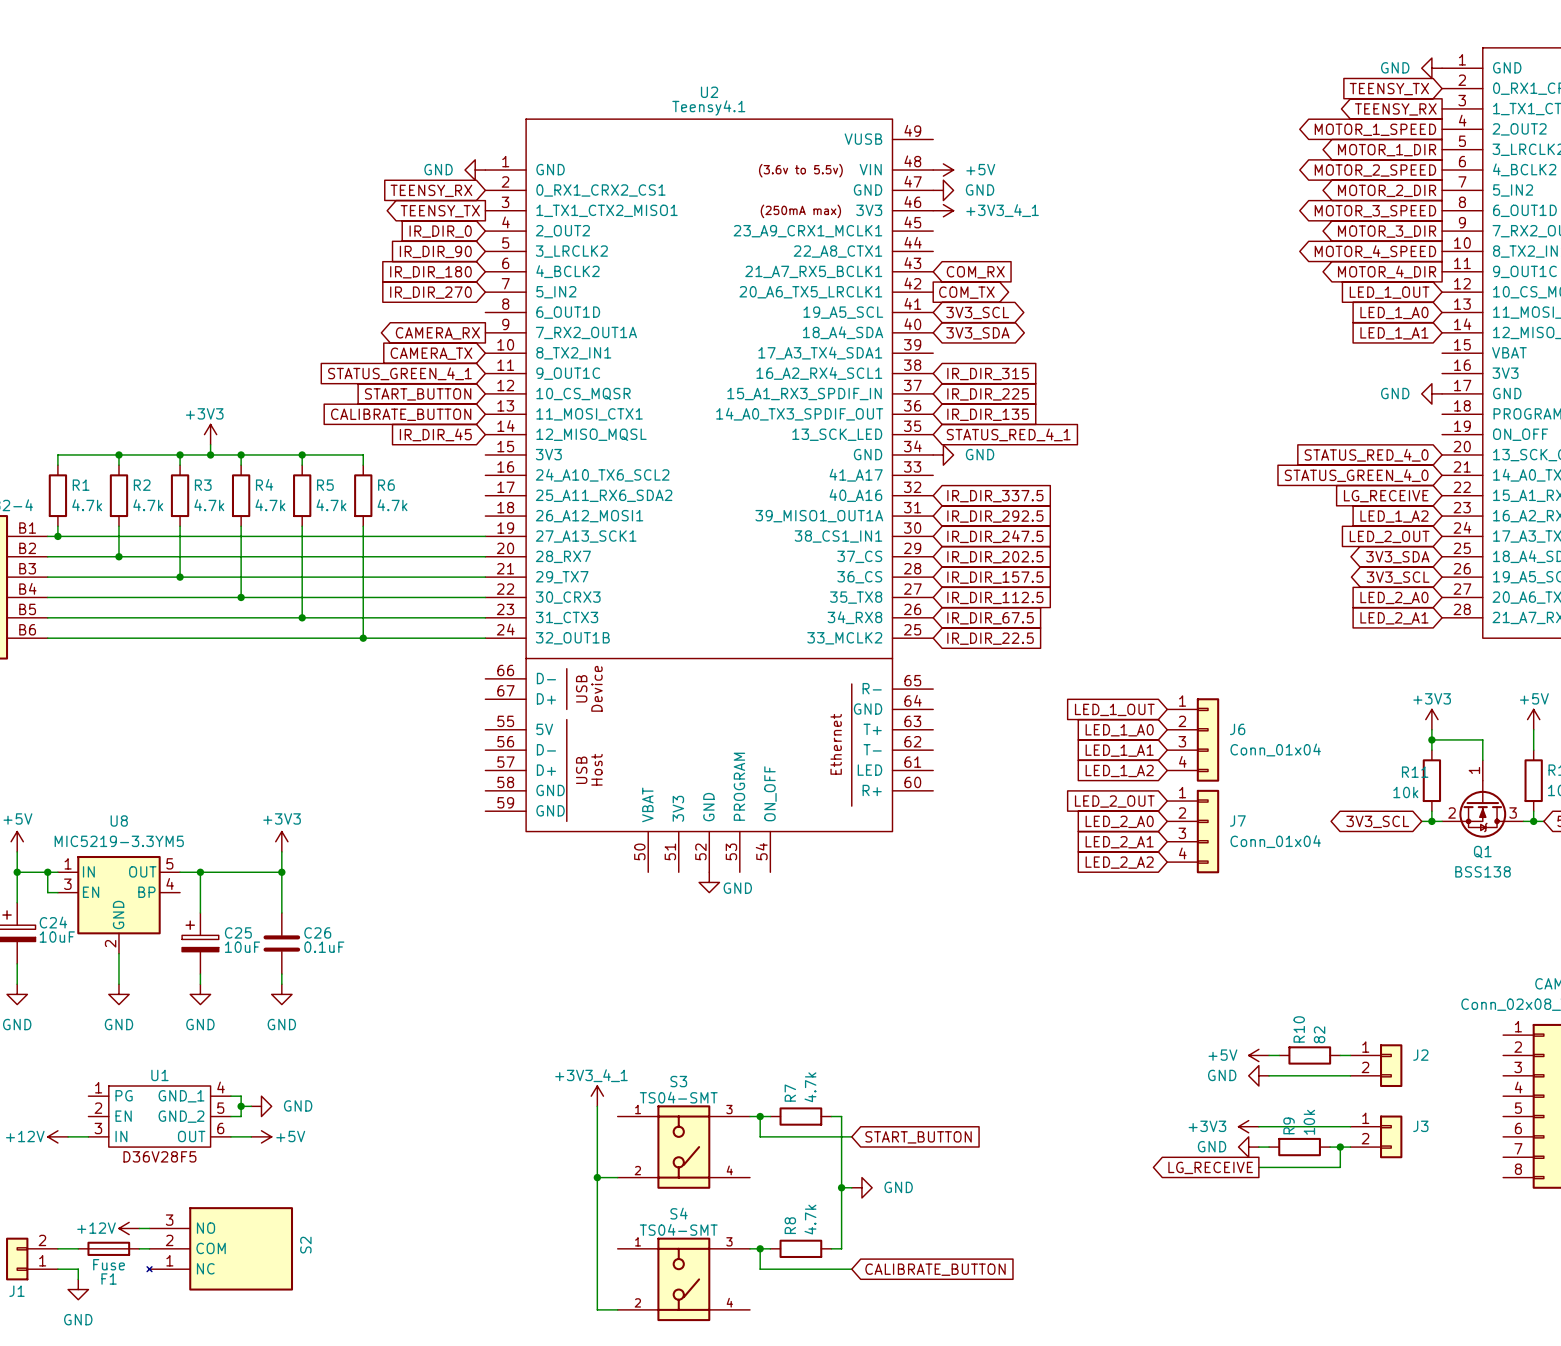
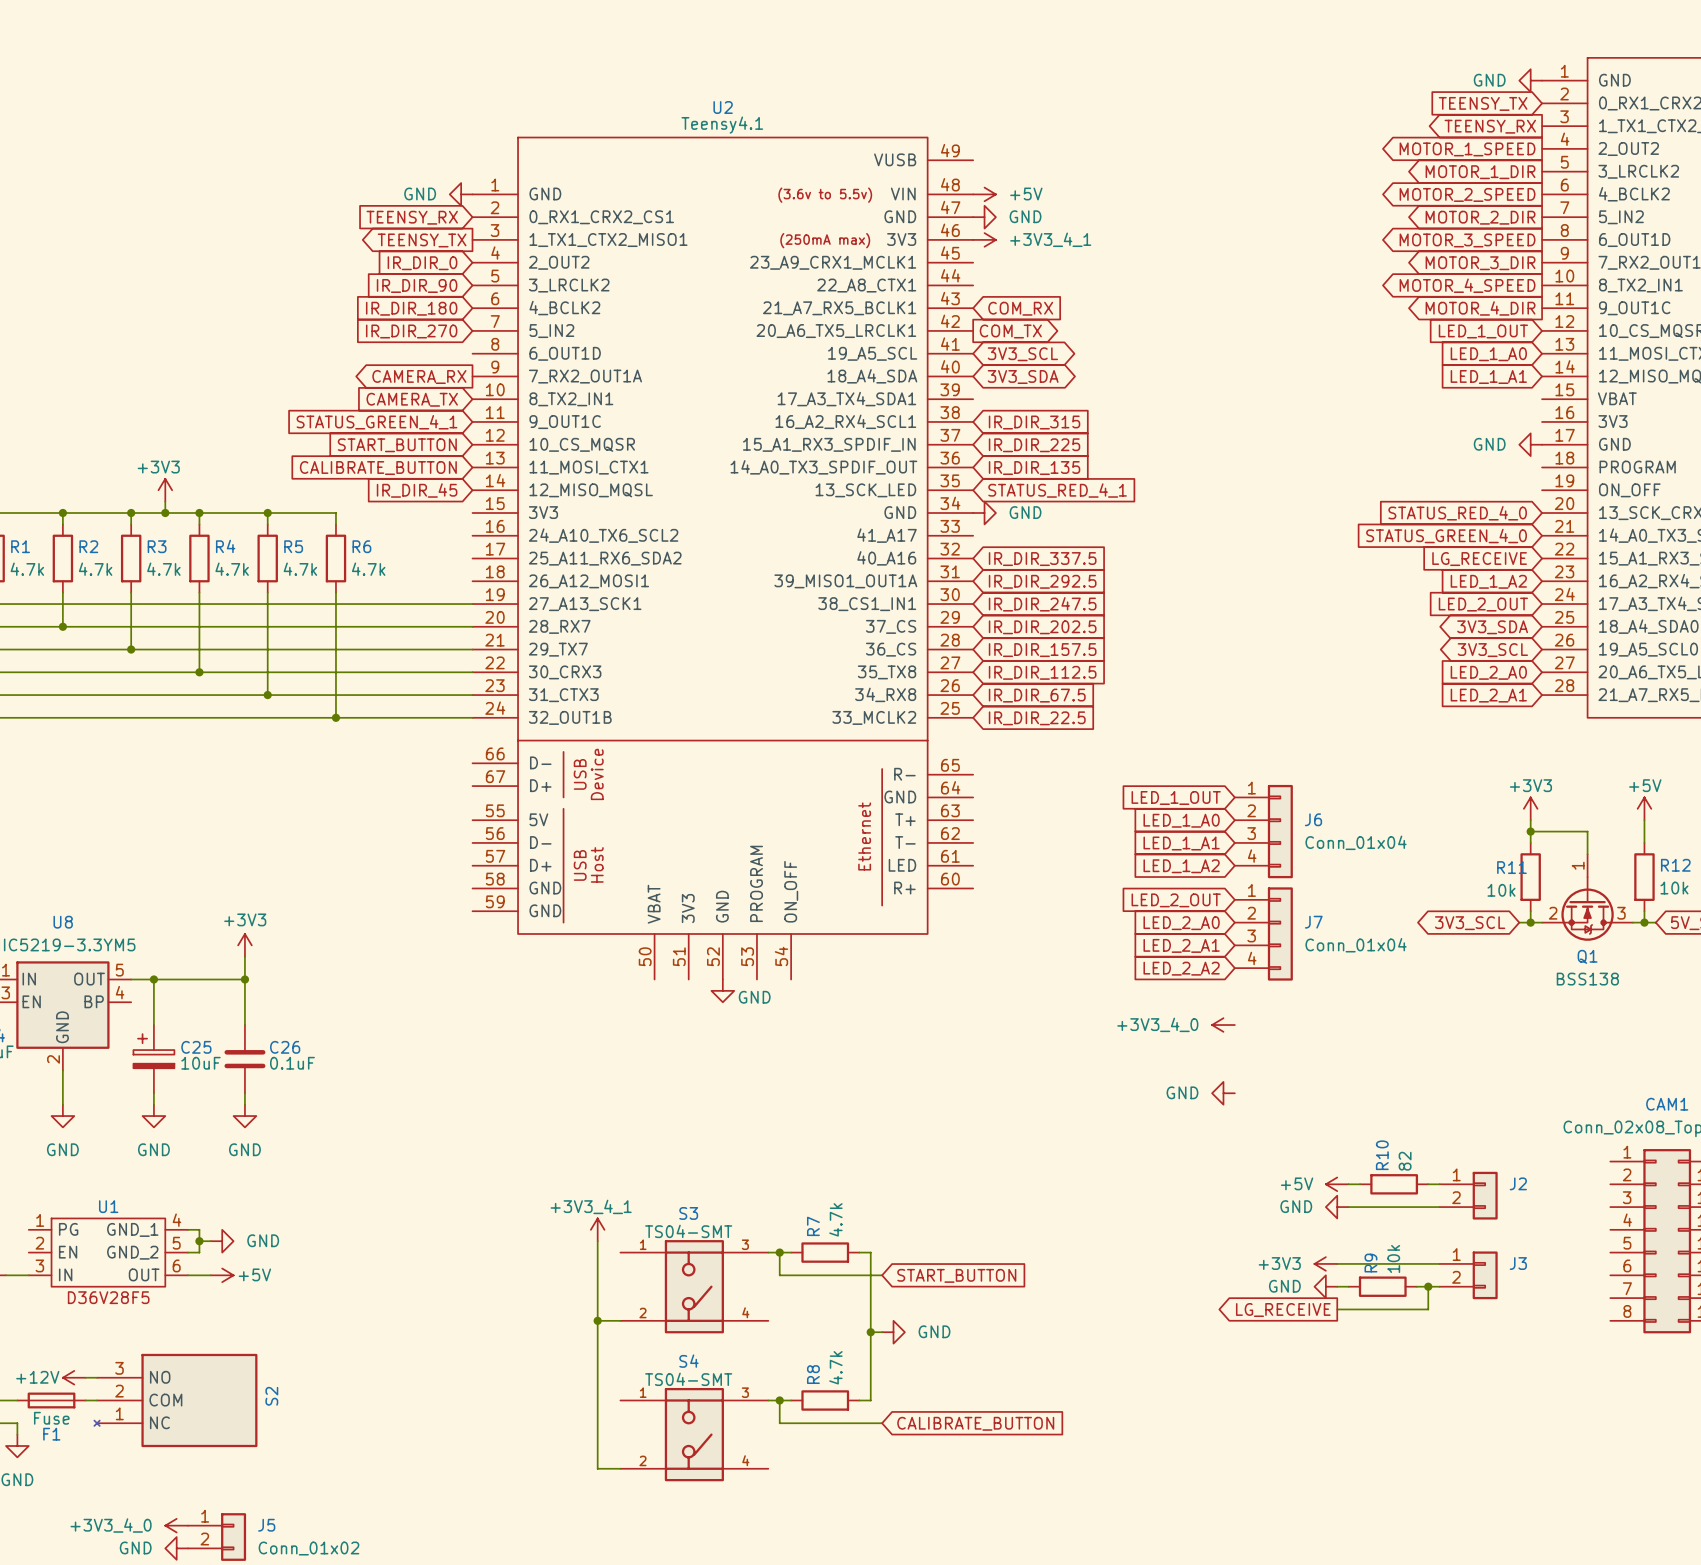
power symbol: none -> +3V3_4_0 (1223, 1025)
power symbol: none -> GND (1223, 1093)

